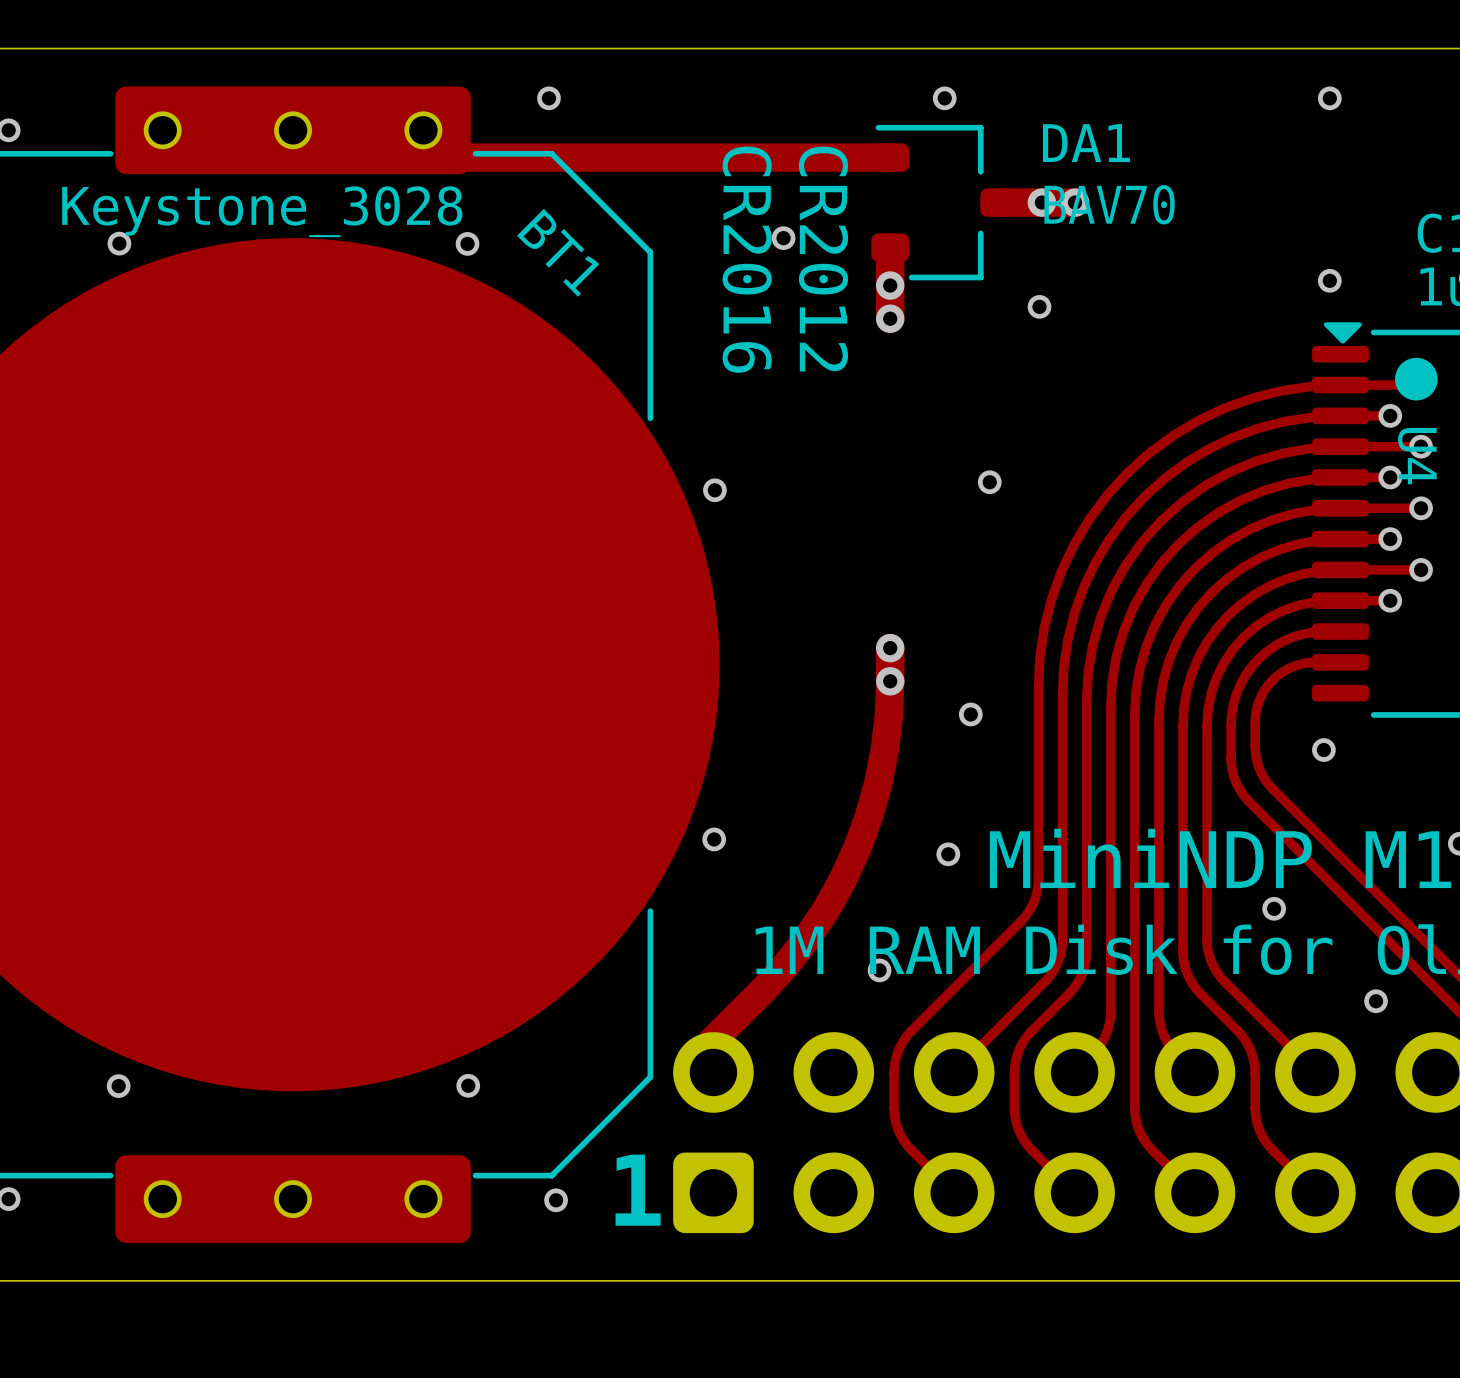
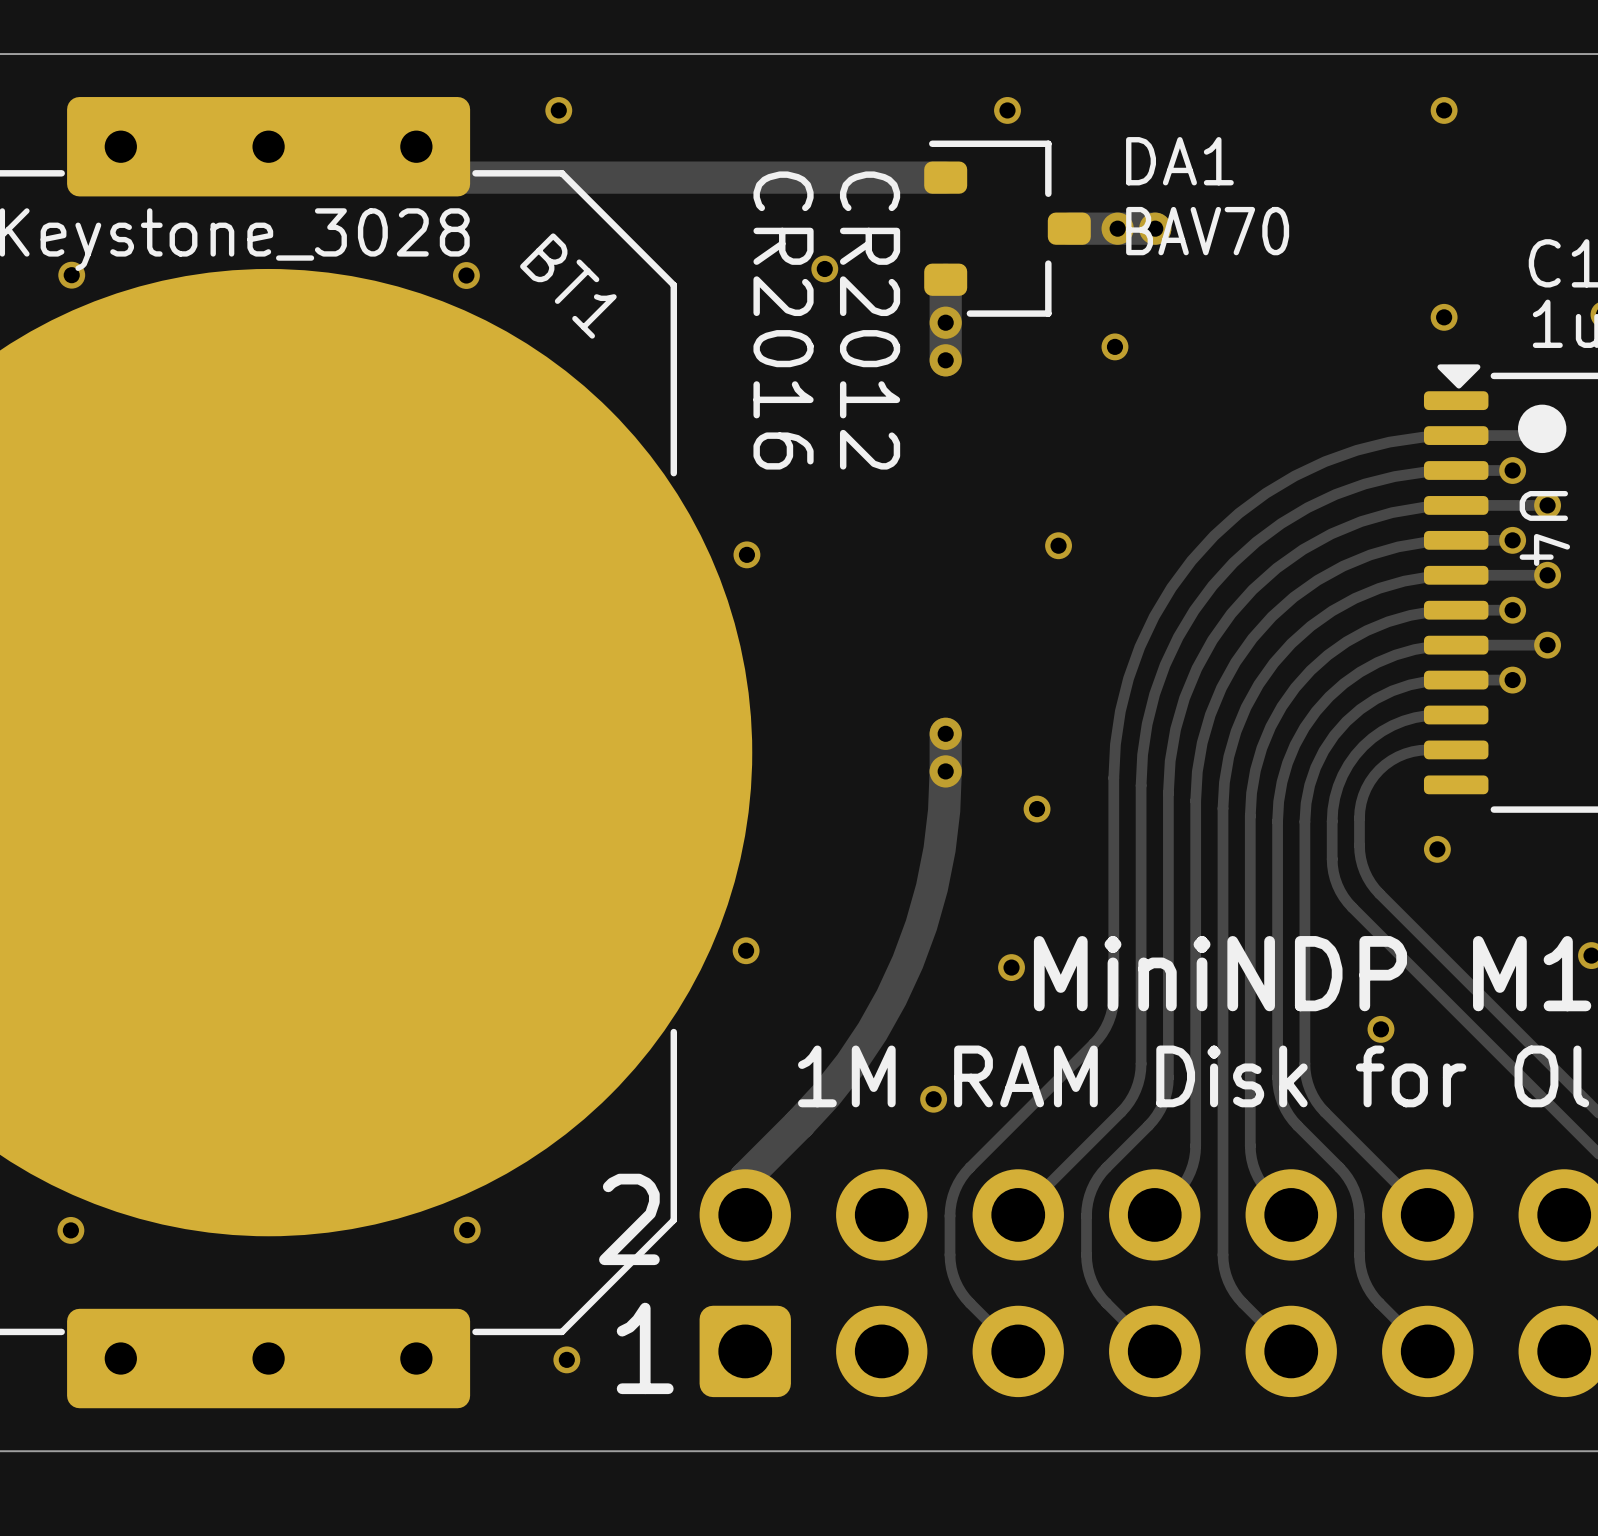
via: (1376, 1001) -> none
text: none -> 2 (629, 1219)

